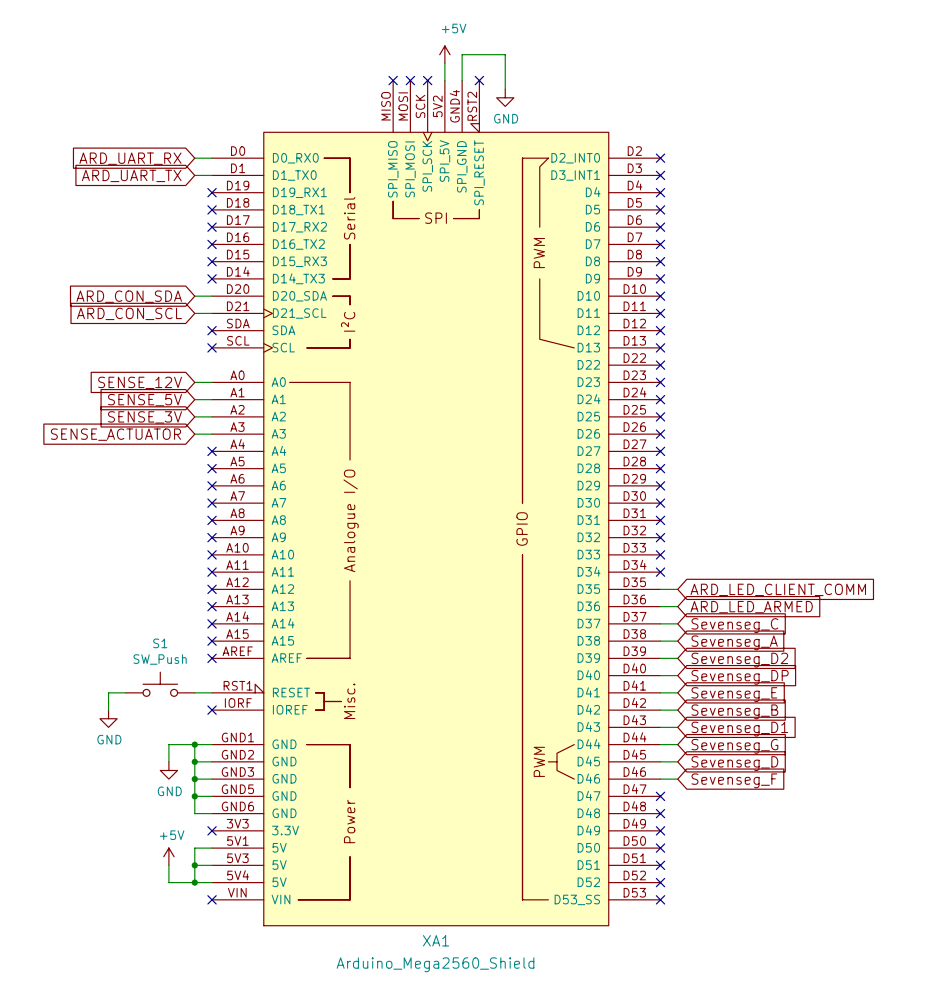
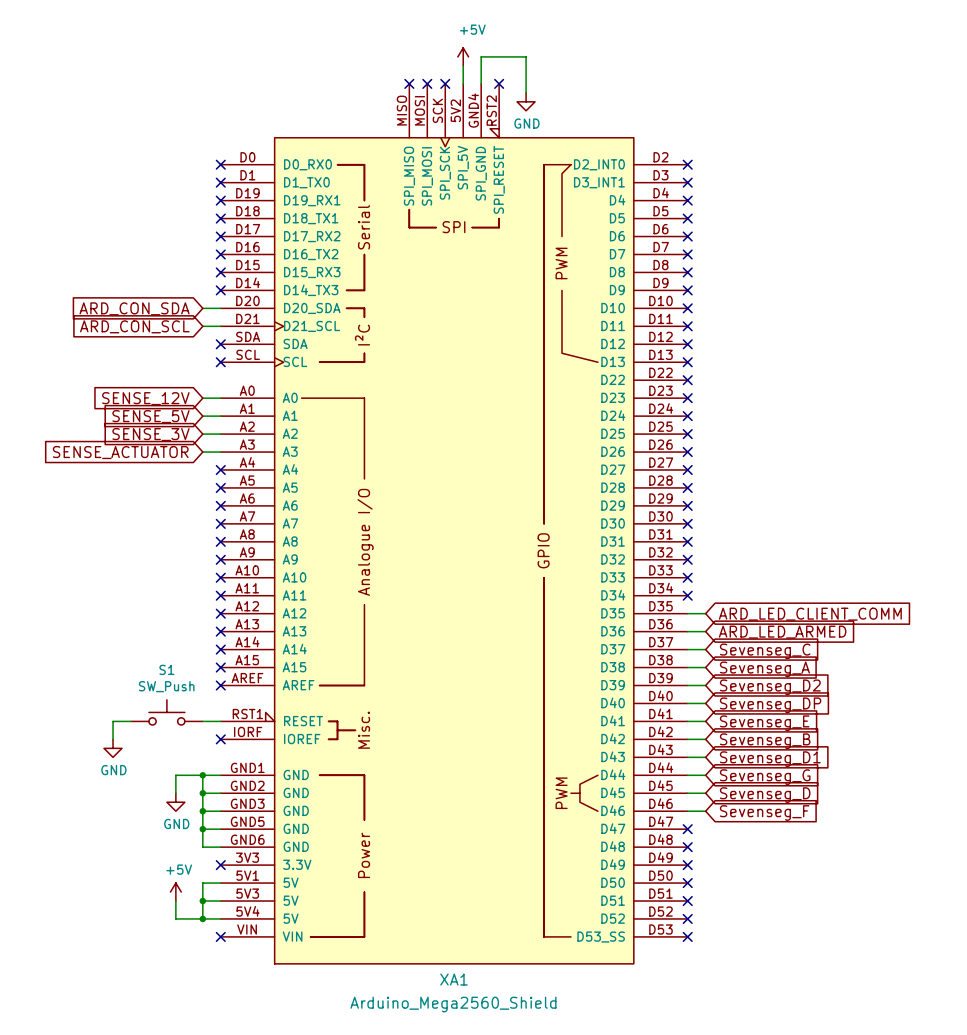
global label: ARD_UART_RX (130, 158) -> none
wire: (194, 158) (212, 158) -> none
no-connect mark: none -> (220, 164)
global label: ARD_UART_TX (131, 175) -> none
wire: (194, 175) (212, 175) -> none
no-connect mark: none -> (220, 182)

